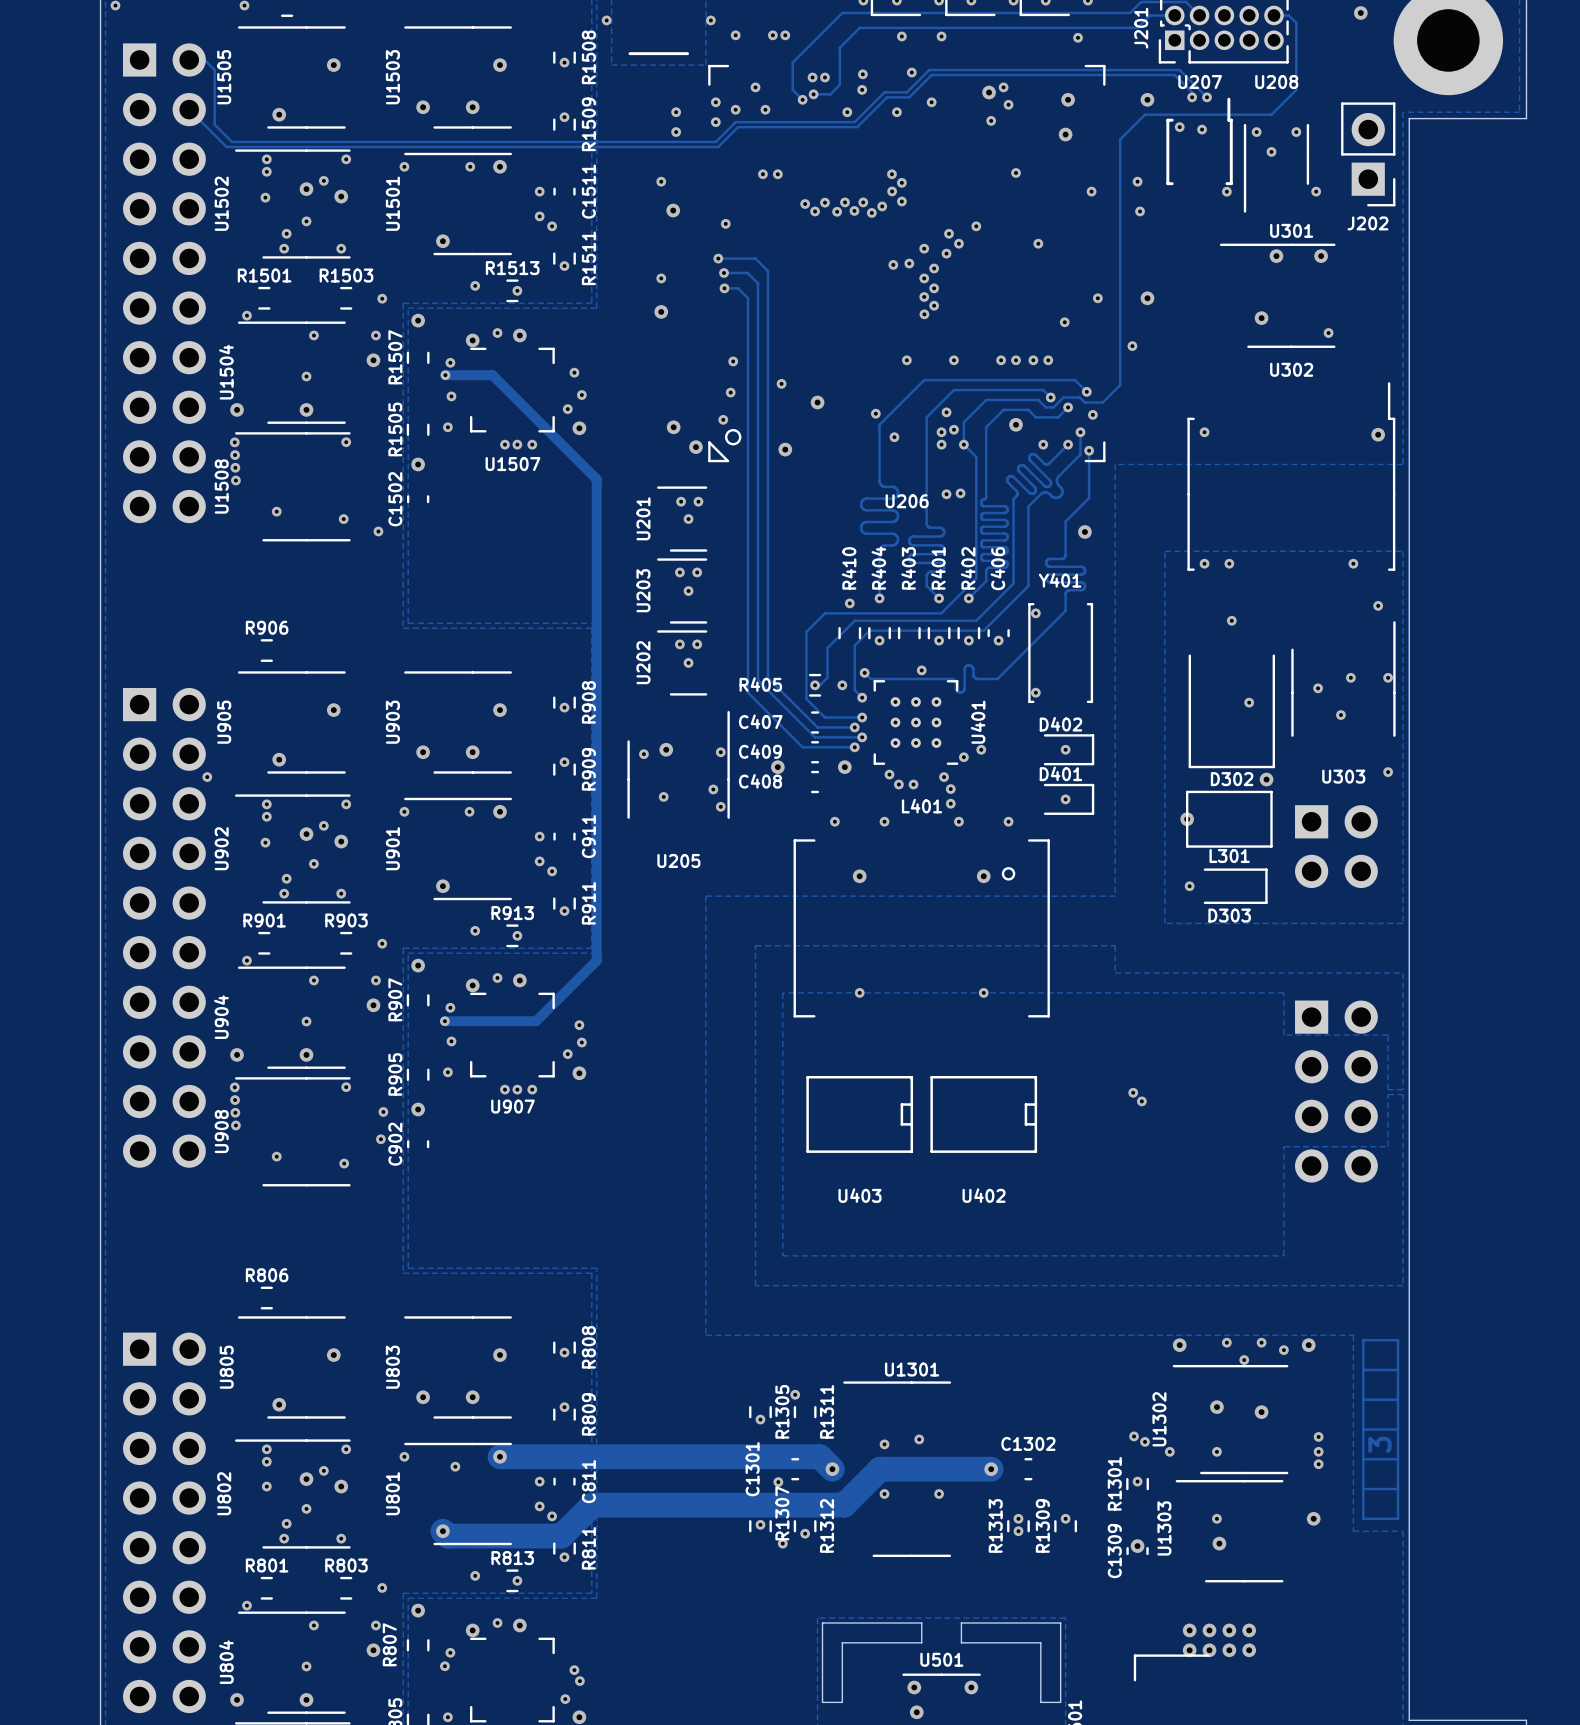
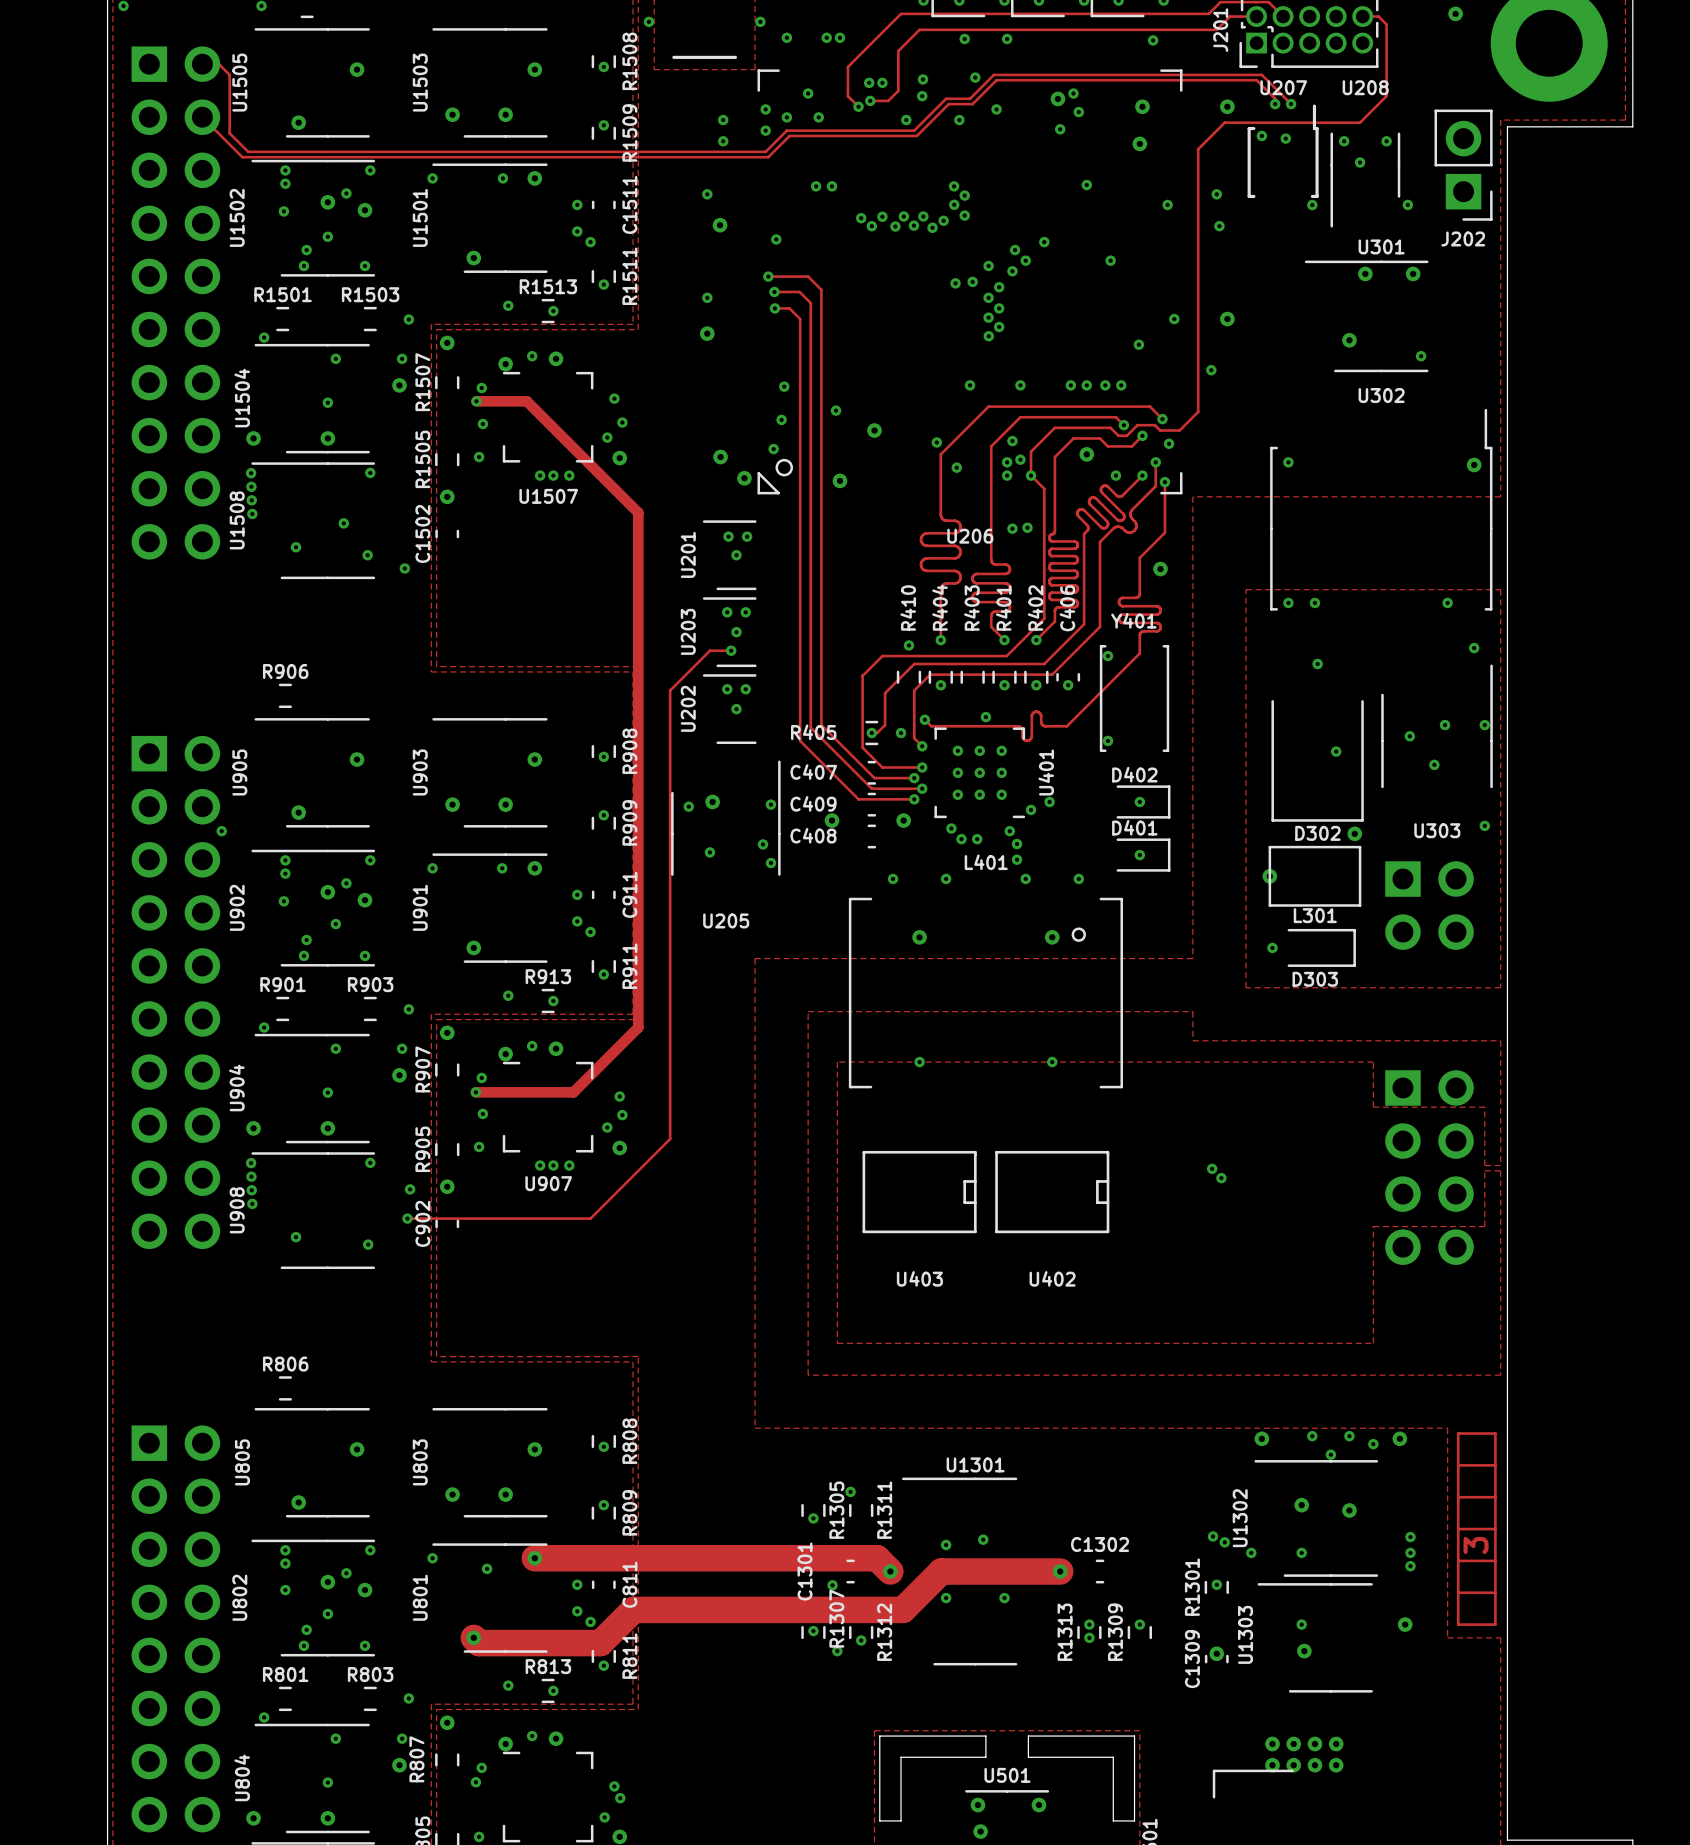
via: none -> (343, 523)
track: none -> (731, 650) (709, 650) (670, 690) (670, 1138) (590, 1218) (407, 1218)
via: none -> (731, 650)

